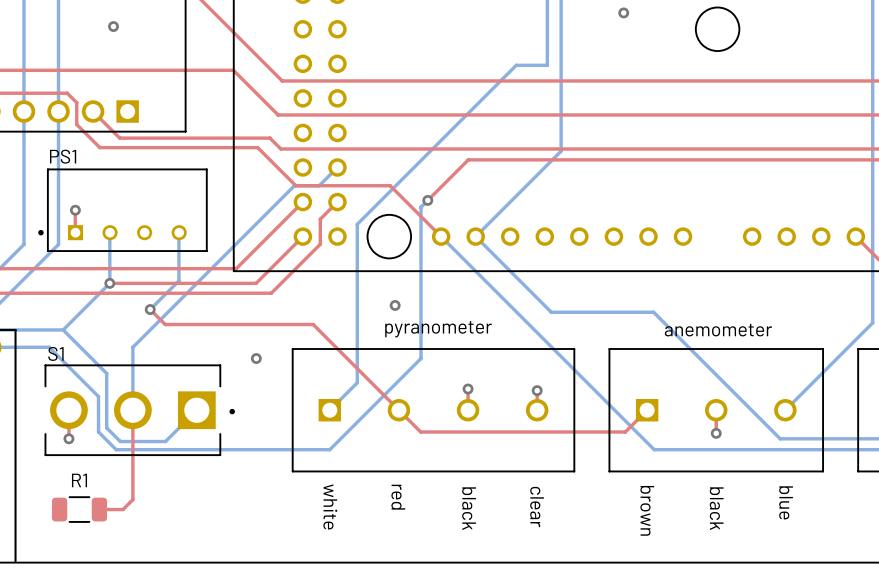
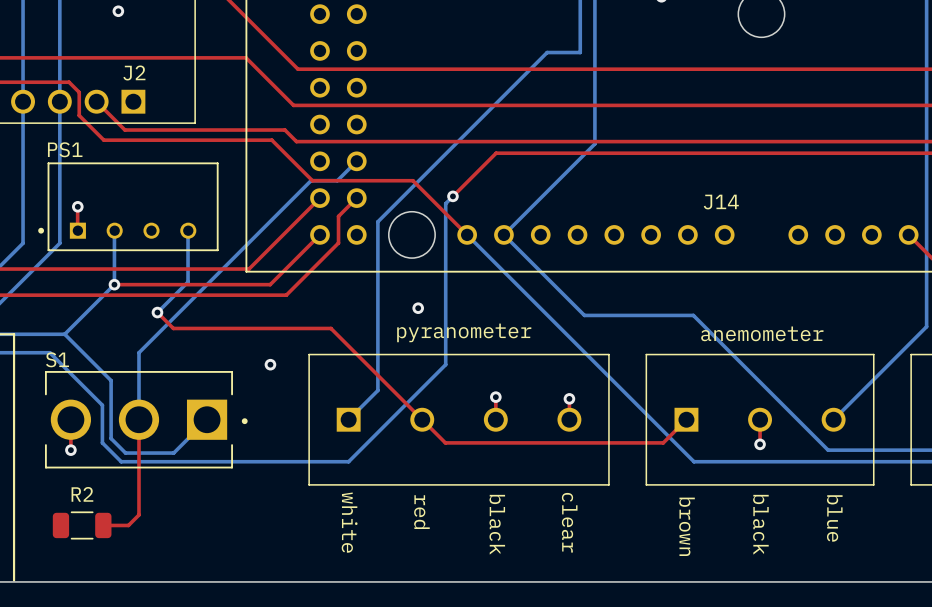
J2 name: none -> J2 (134, 72)
text: none -> J14 (721, 202)
R1 name: R1 (79, 480) -> R2 (82, 494)

